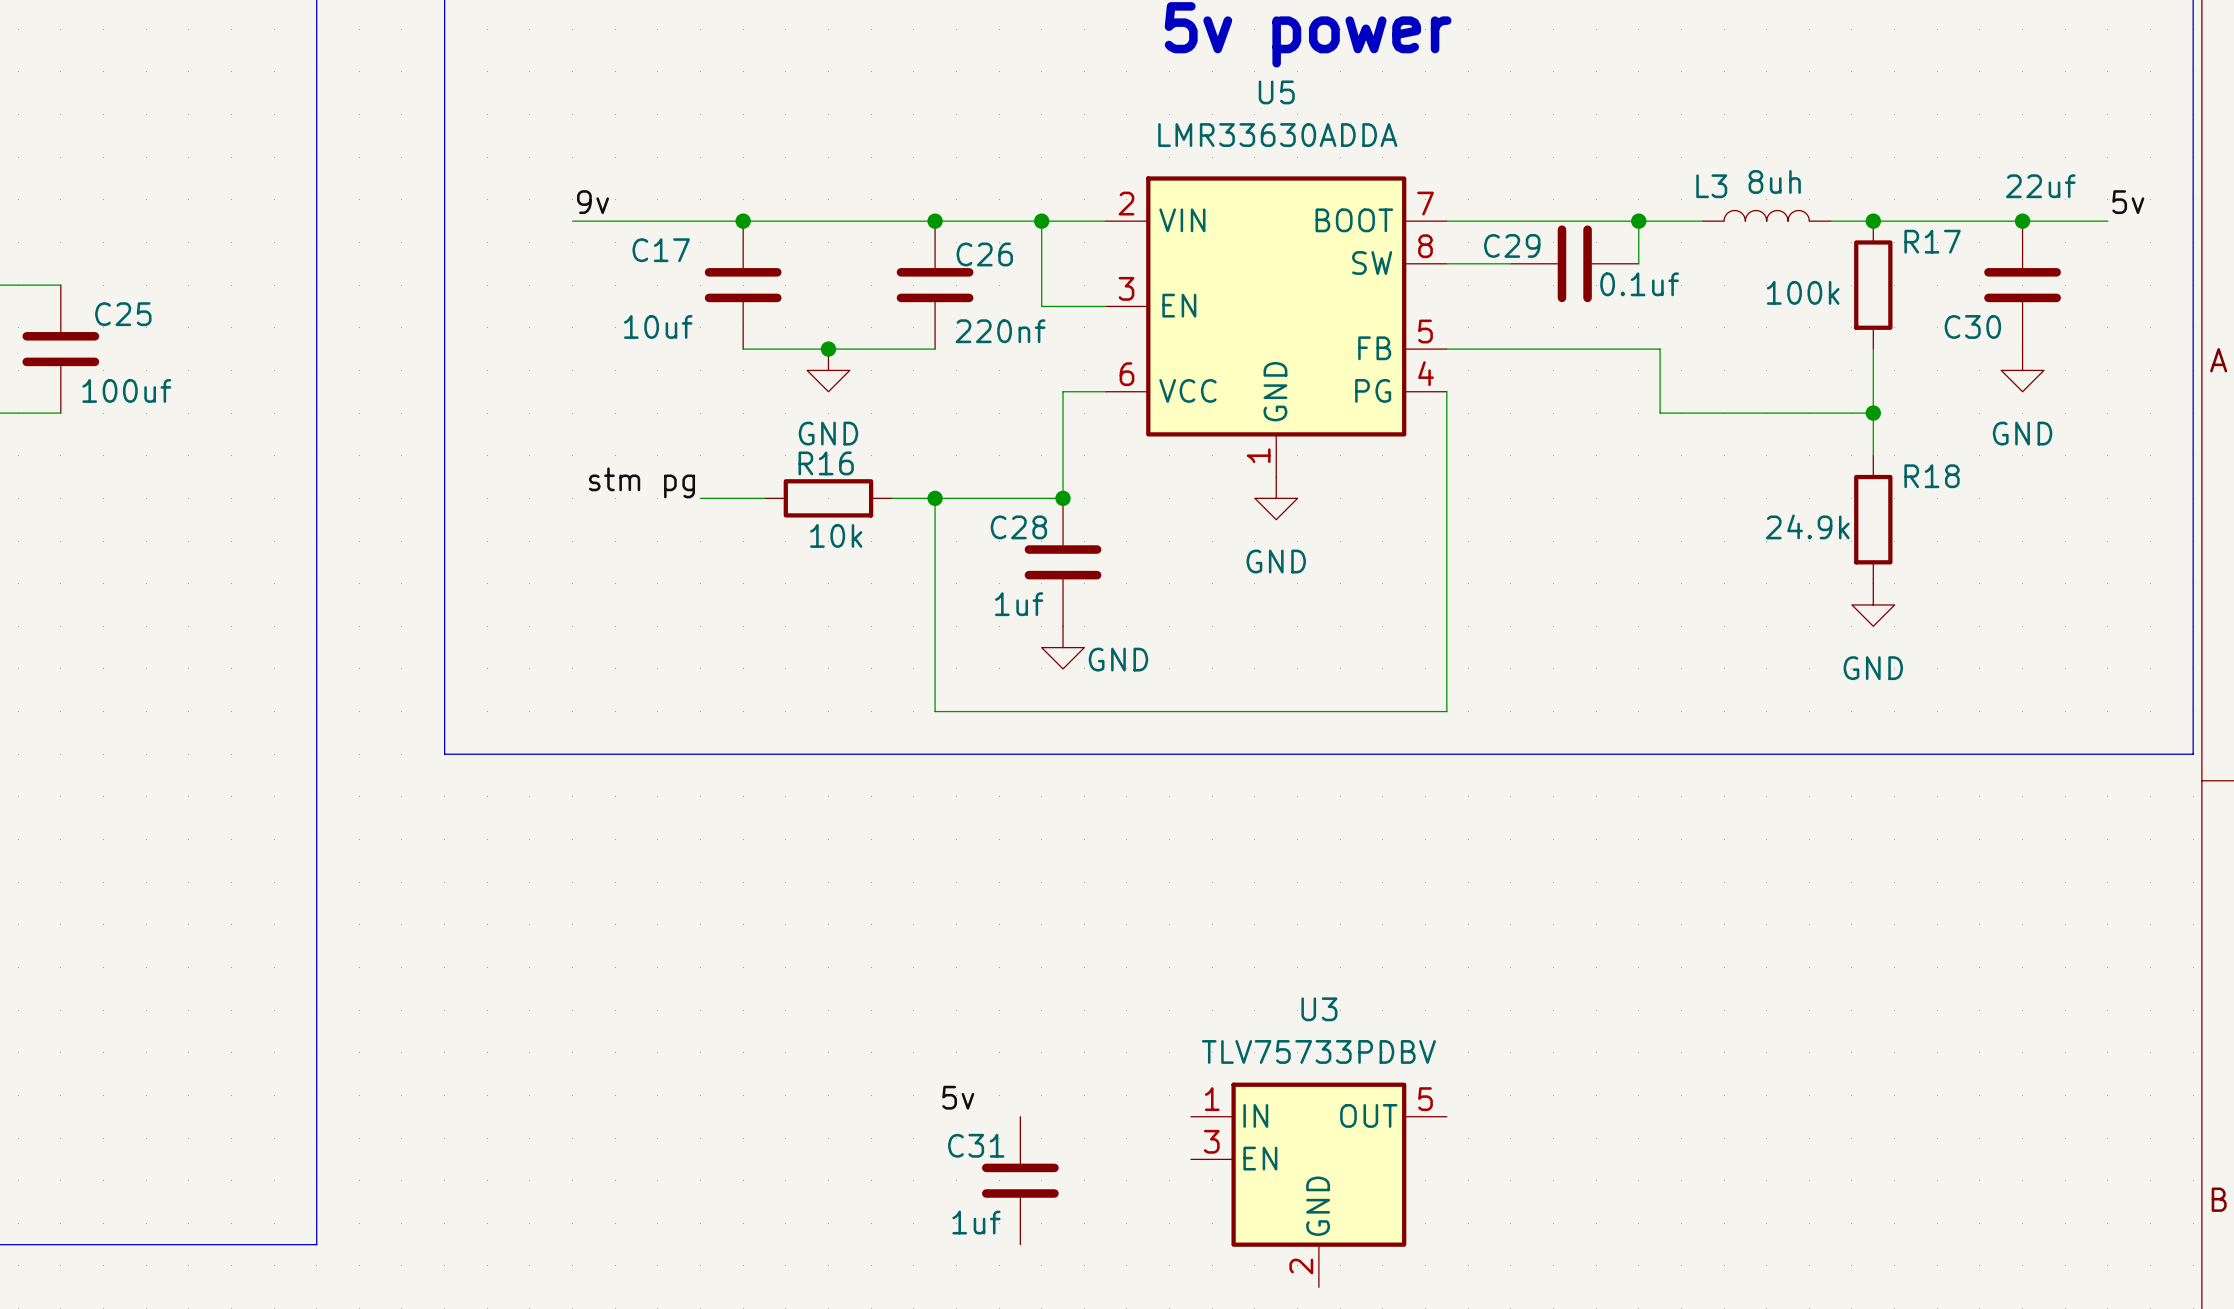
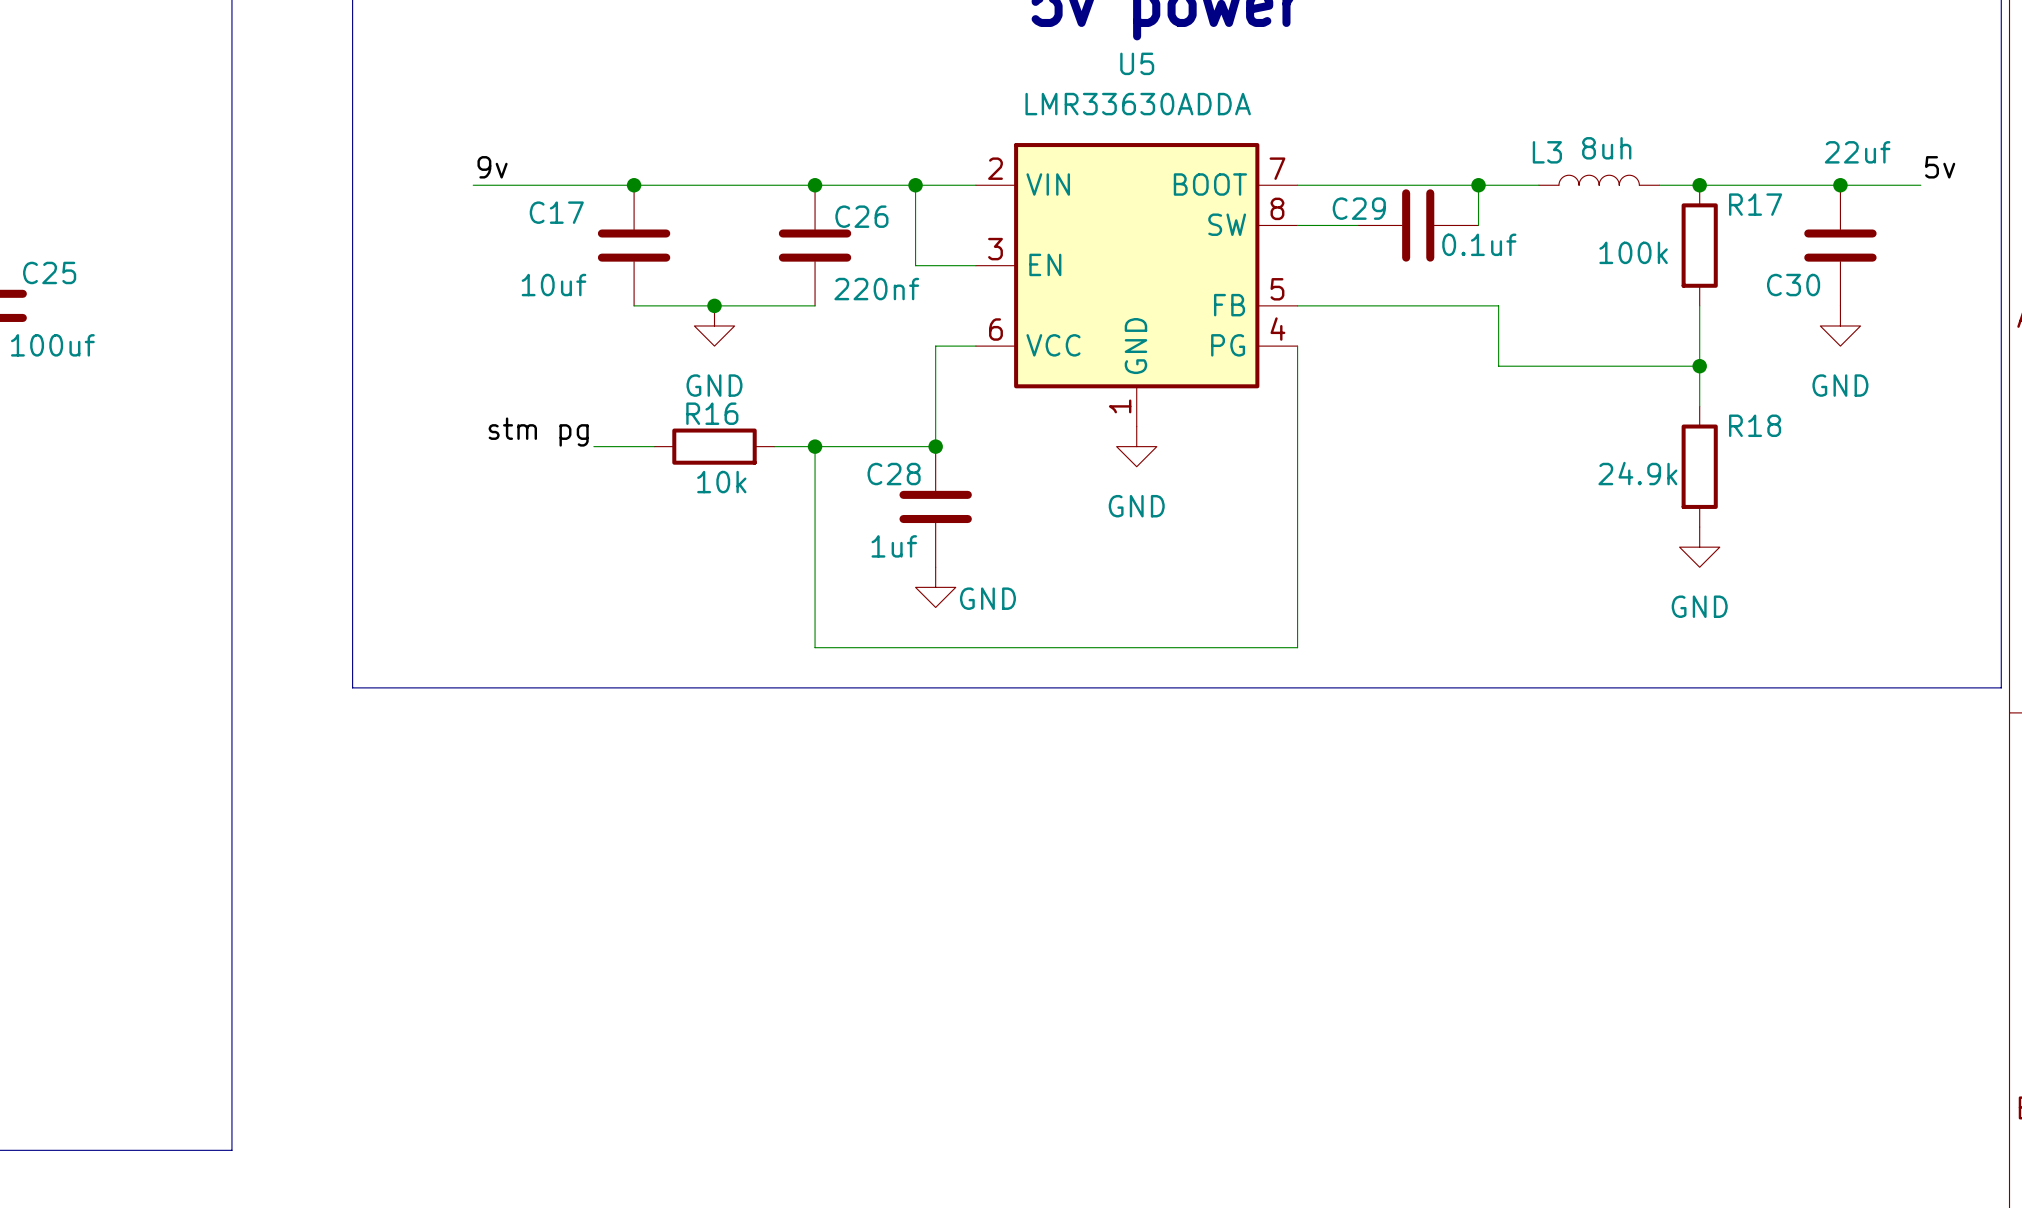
label: 5v (958, 1097) -> none
C31: 1uf (1020, 1180) -> none
U3: TLV75733PDBV (1318, 1184) -> none

